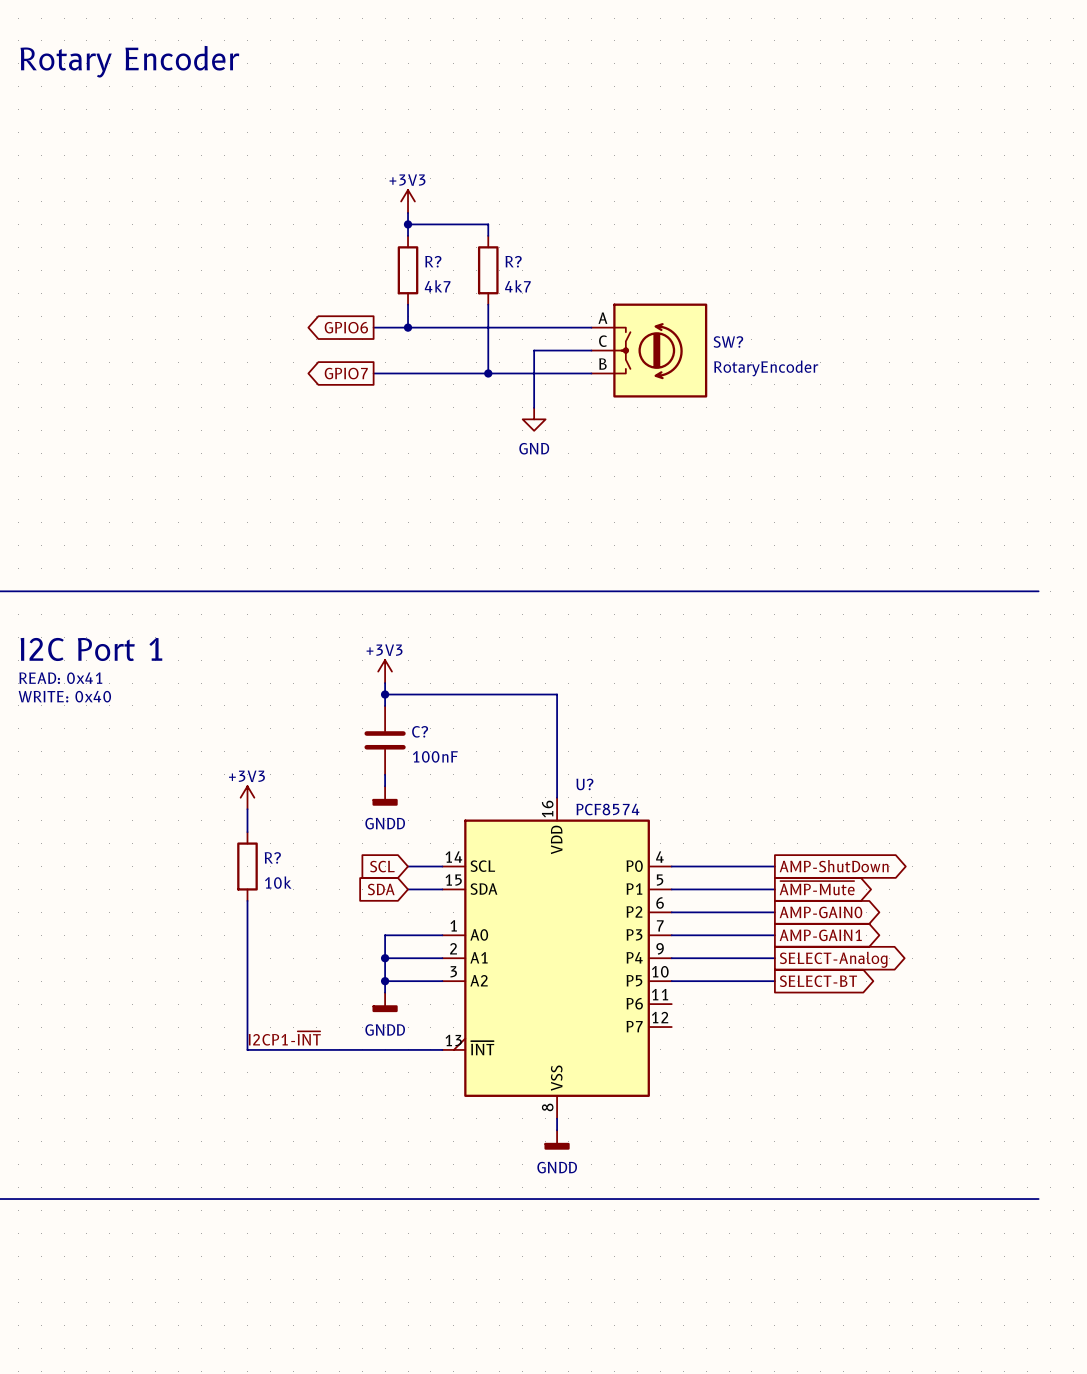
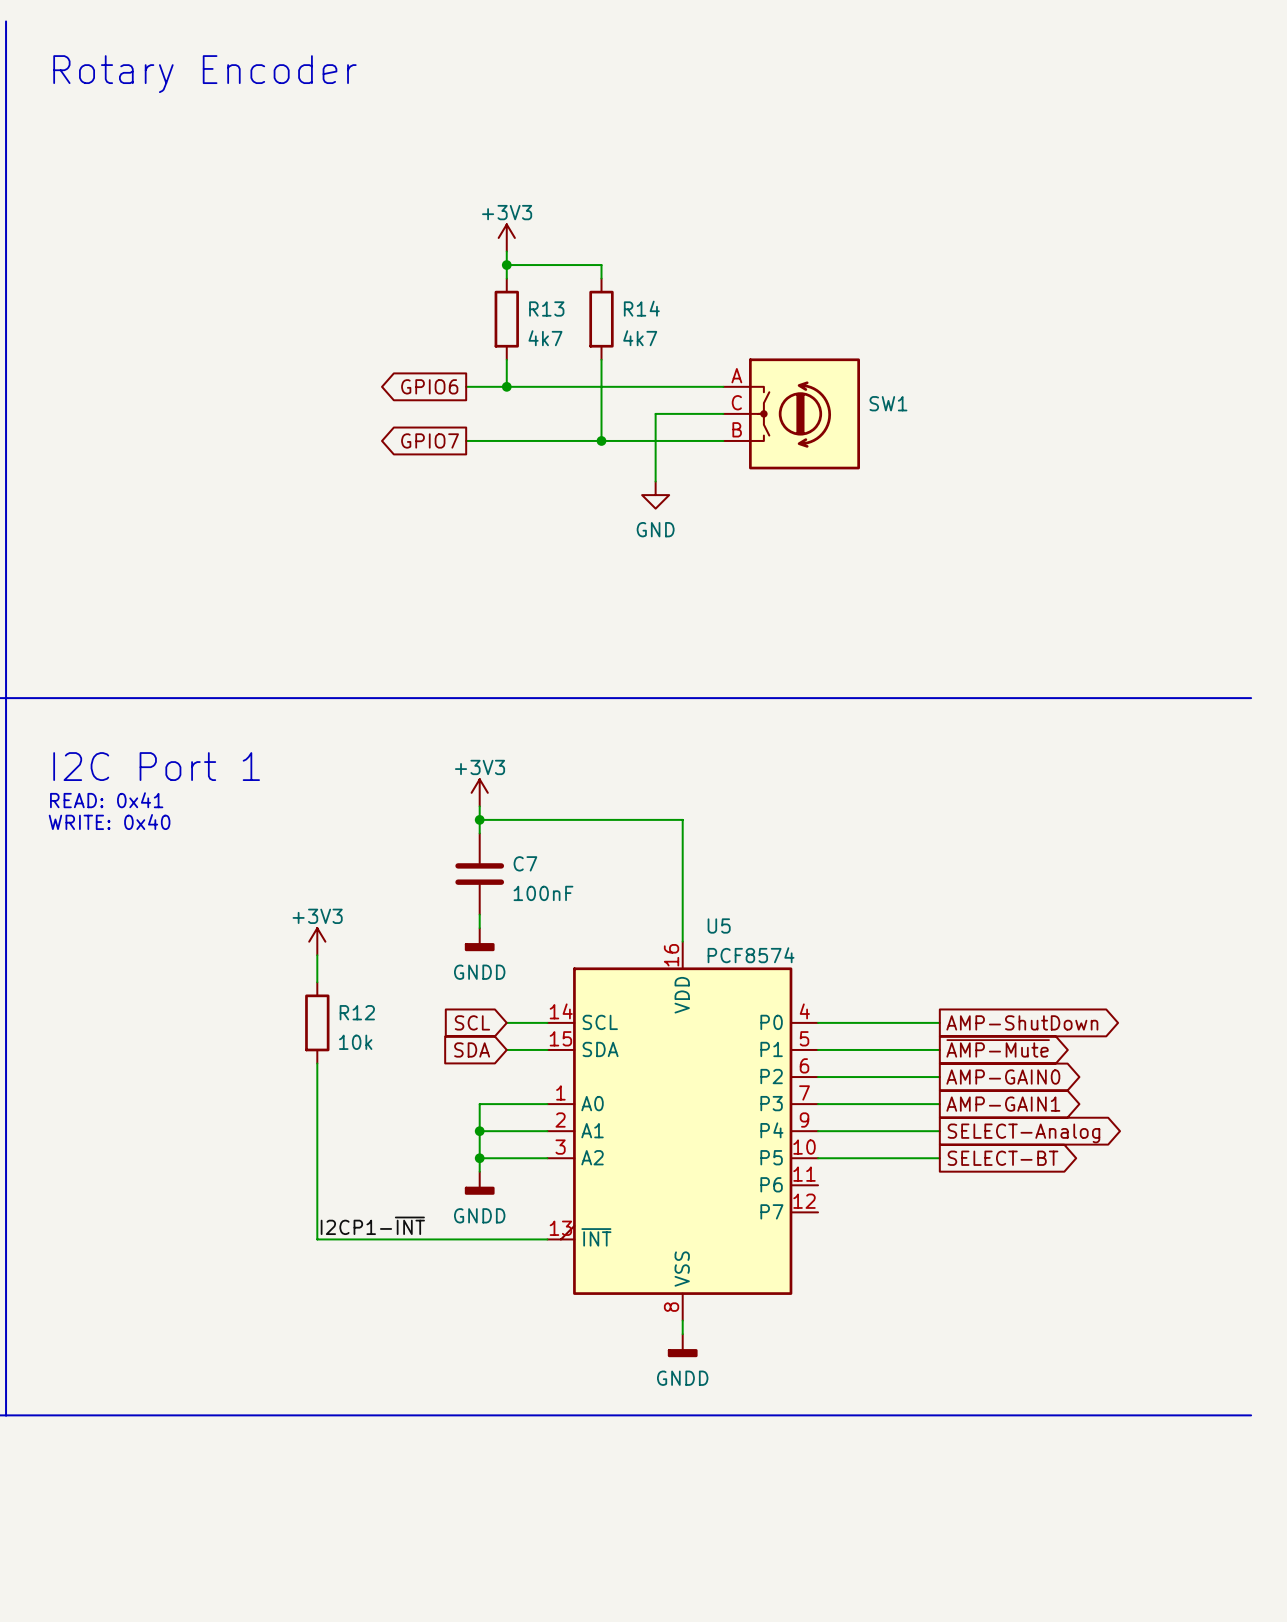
R? name: R? (433, 261) -> R13 (546, 308)
R? name: R? (513, 261) -> R14 (641, 308)
SW? name: SW? (728, 341) -> SW1 (888, 403)
SW? value: RotaryEncoder (766, 368) -> none
C? name: C? (420, 731) -> C7 (525, 863)
U? name: U? (584, 784) -> U5 (719, 926)
R? name: R? (272, 857) -> R12 (357, 1012)

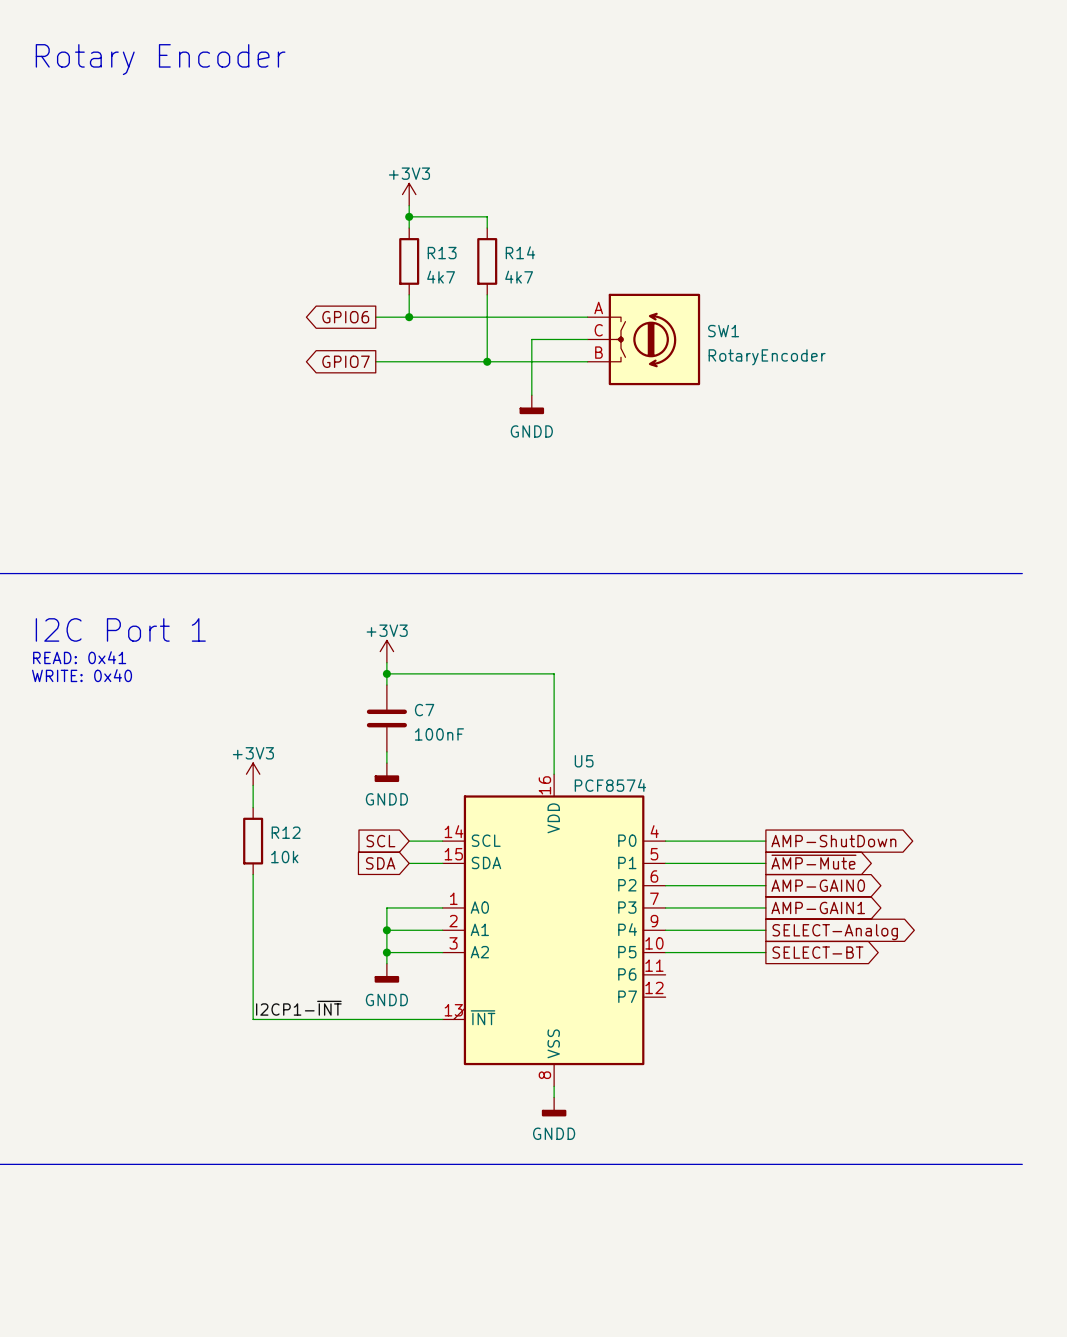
SW1 value: none -> RotaryEncoder (767, 357)
power symbol: GND (655, 495) -> GNDD (531, 404)

